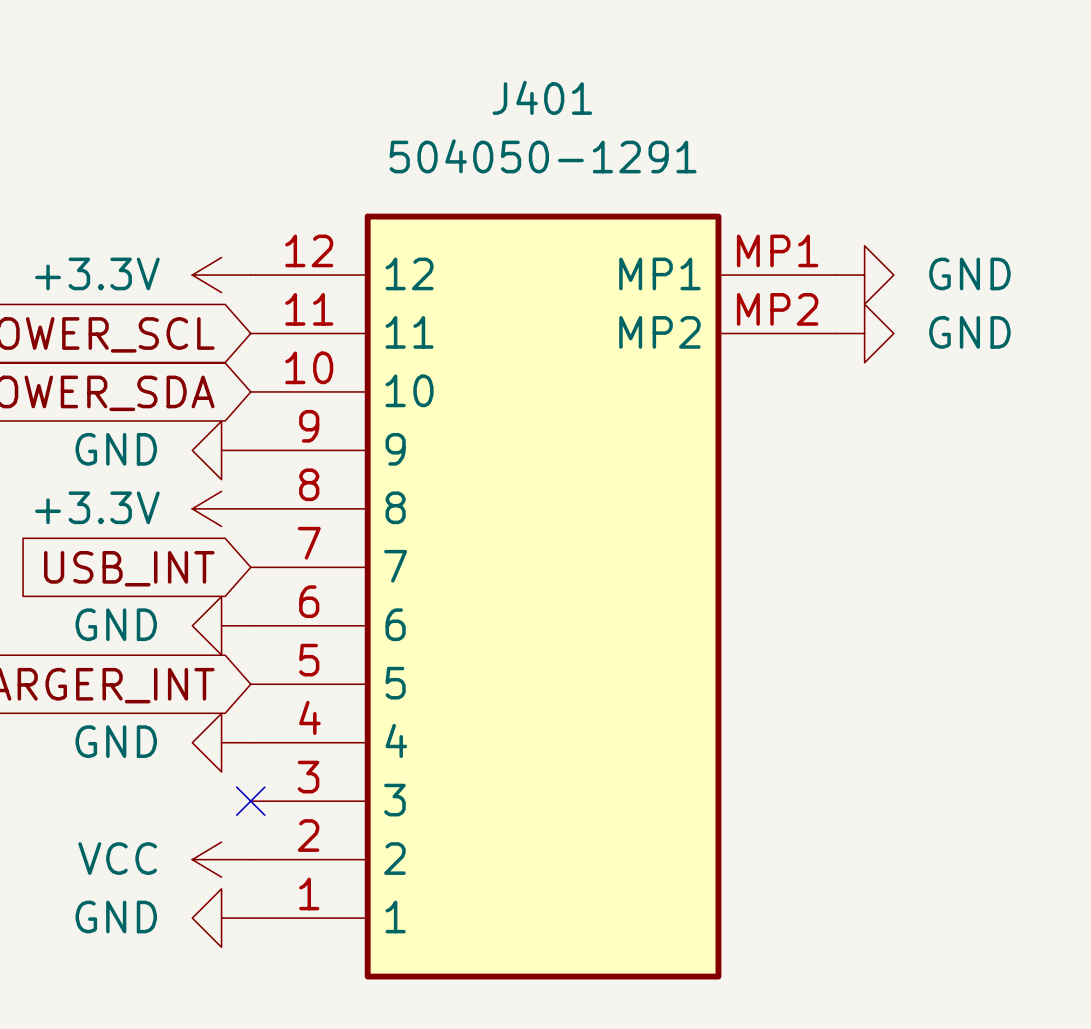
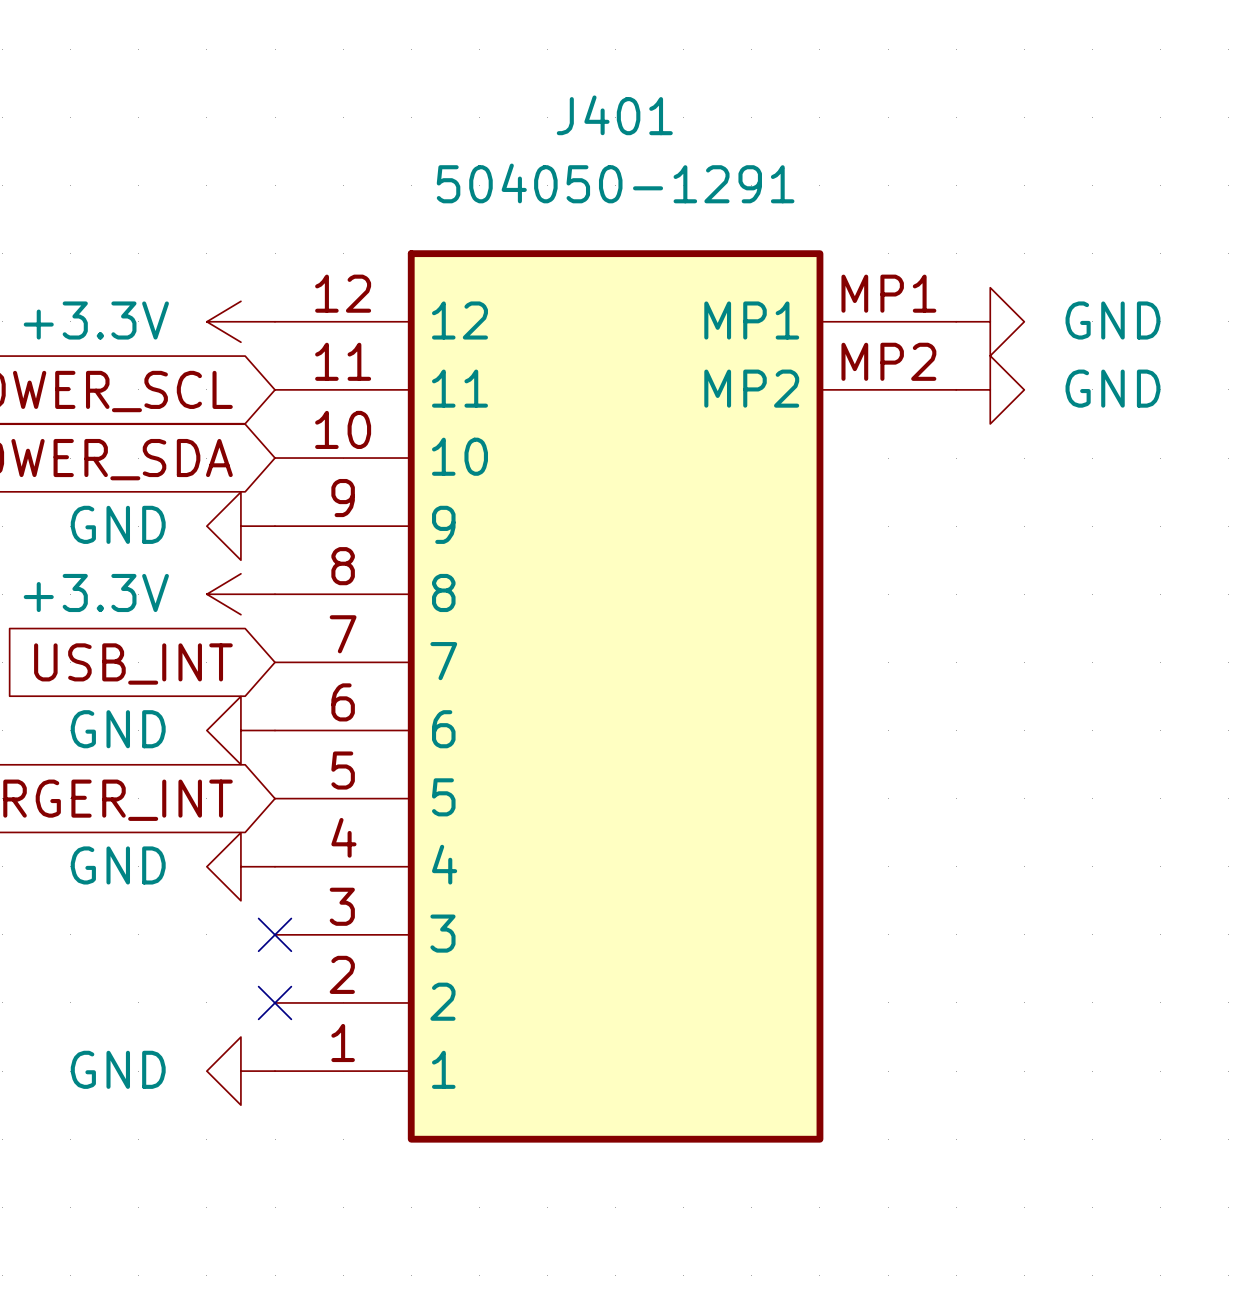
power symbol: VCC (221, 859) -> none
no-connect mark: none -> (275, 1002)

